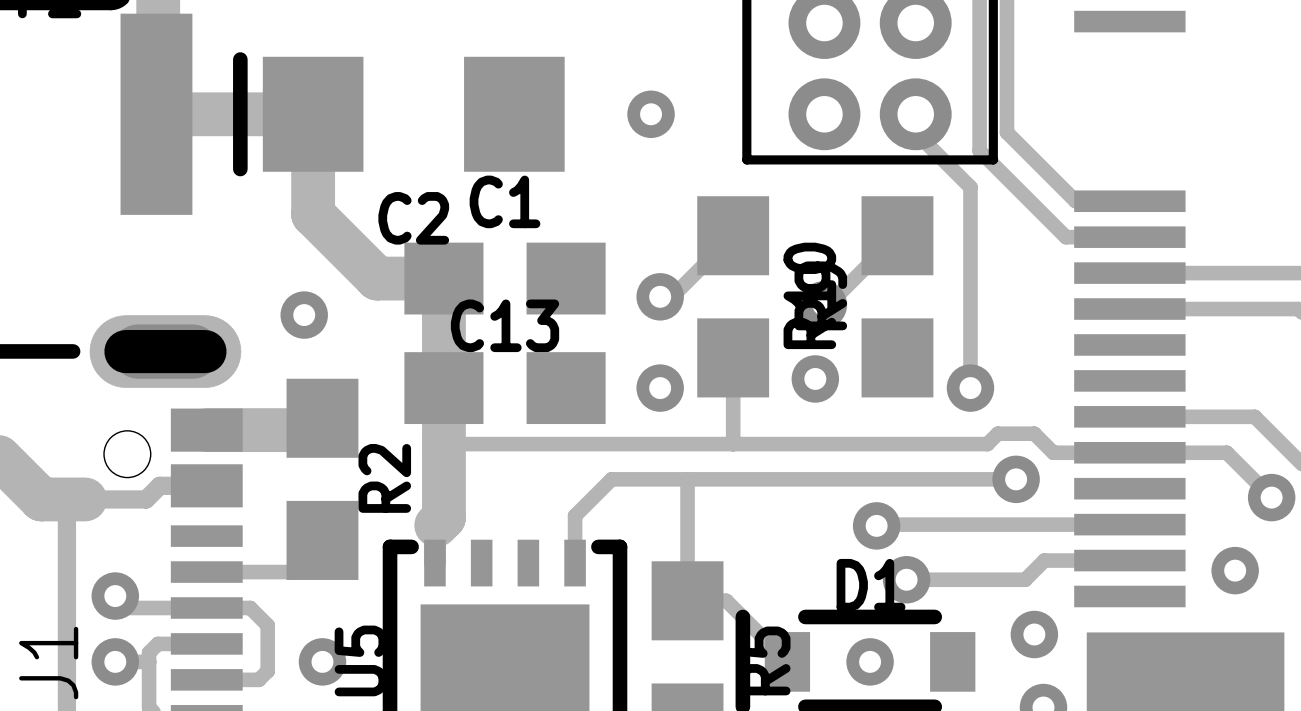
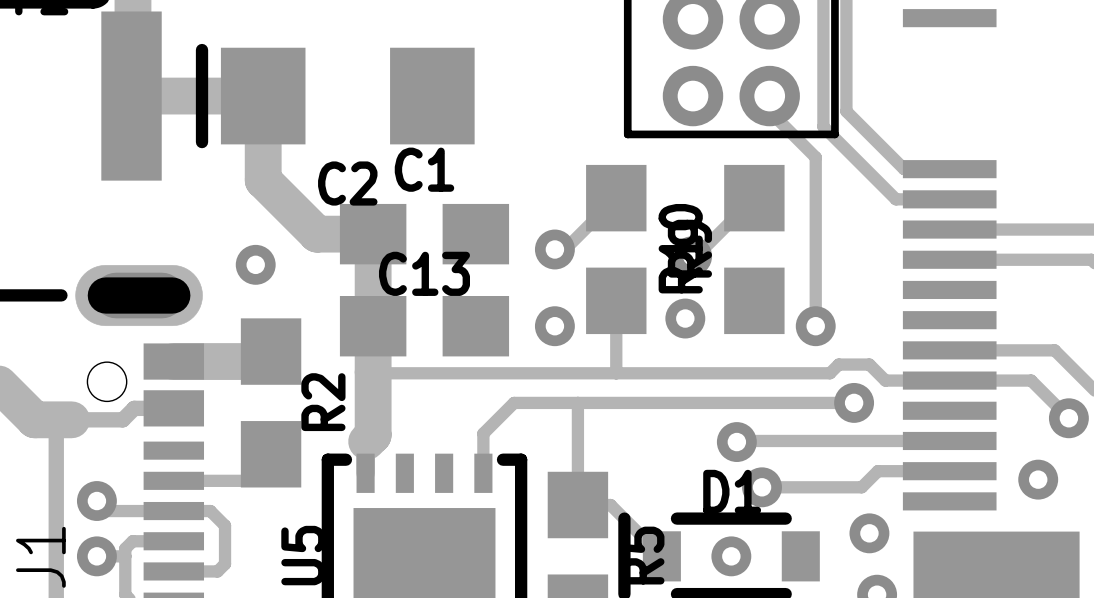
via: (651, 114) -> none
via: (322, 661) -> none

